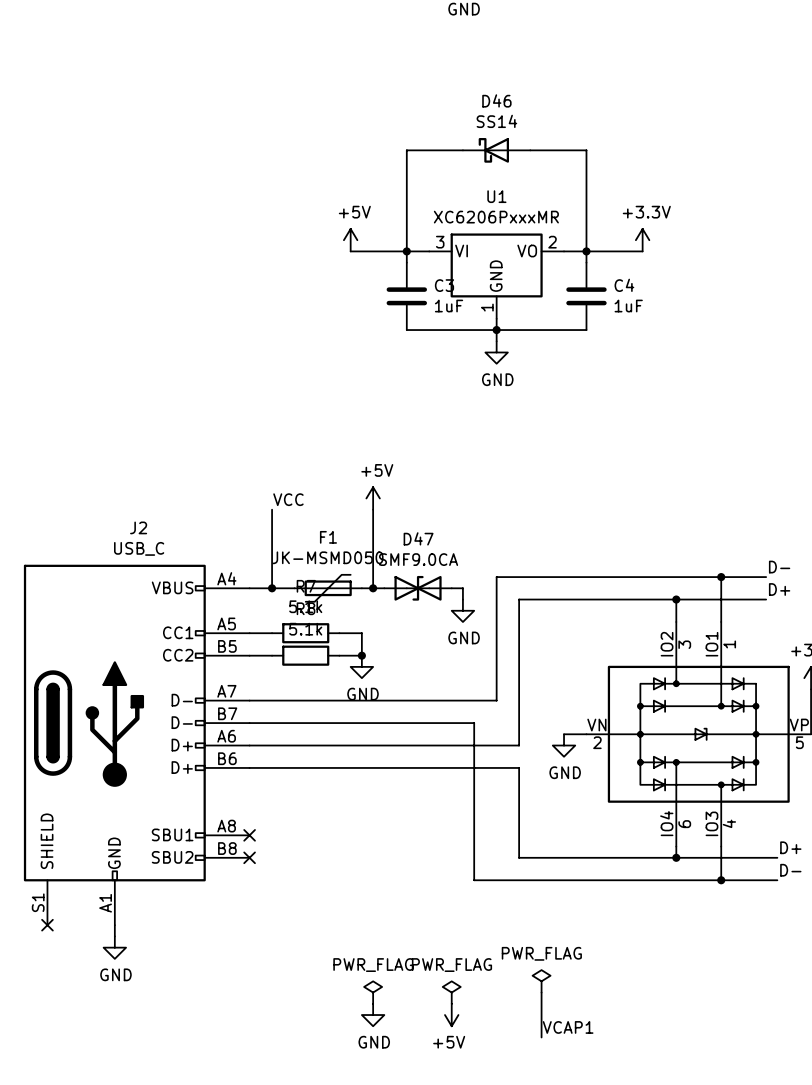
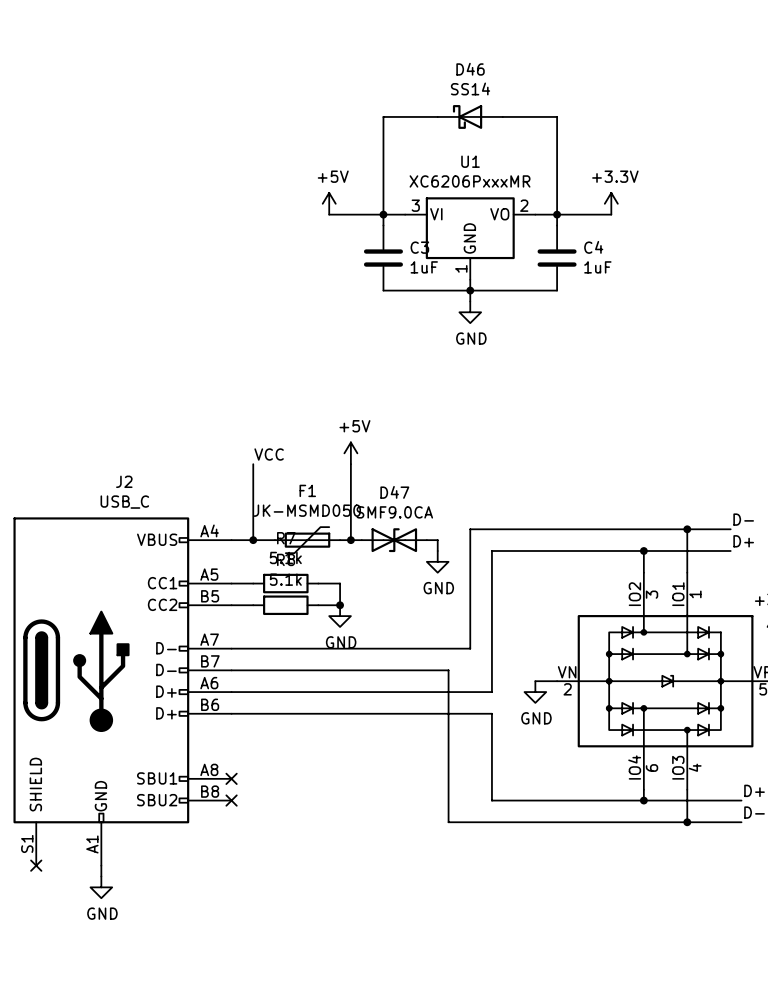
power symbol: PWR_FLAG (541, 981) -> none
power symbol: PWR_FLAG (373, 992) -> none
power symbol: PWR_FLAG (451, 992) -> none
wire: (541, 992) (541, 1037) -> none
power symbol: GND (373, 1015) -> none
power symbol: +5V (451, 1015) -> none
label: VCAP1 (568, 1027) -> none

